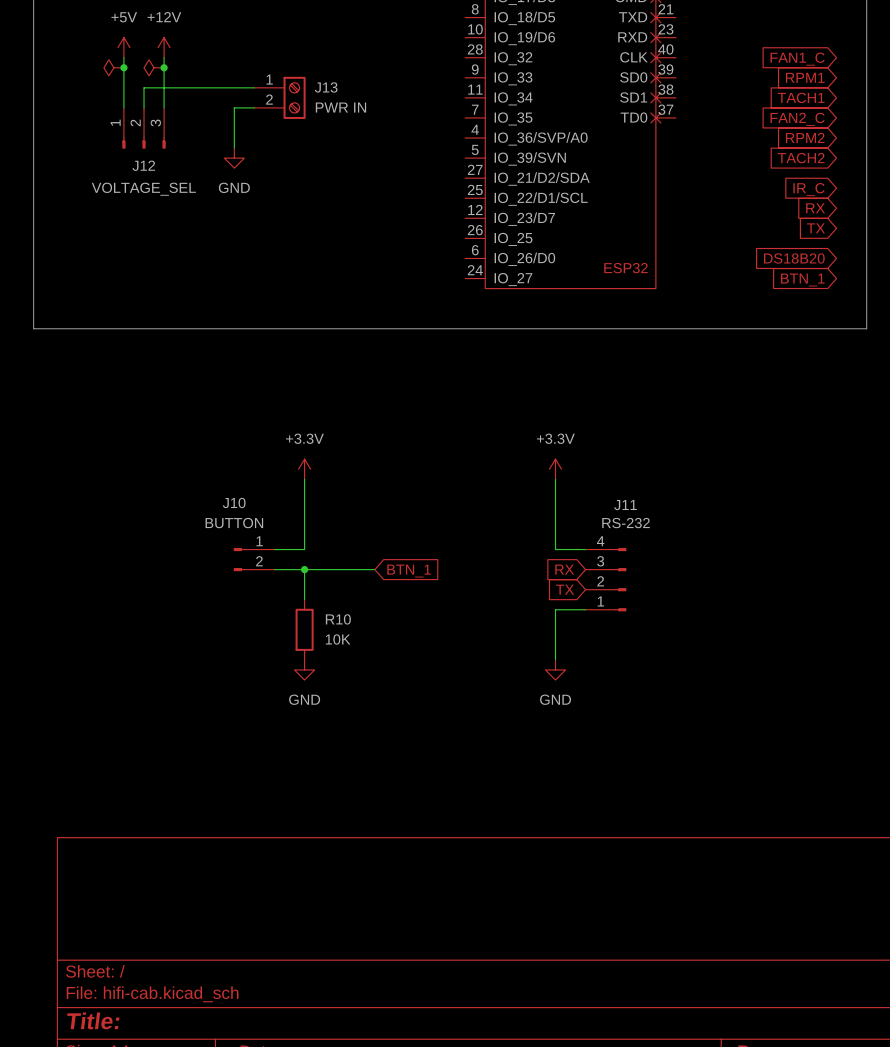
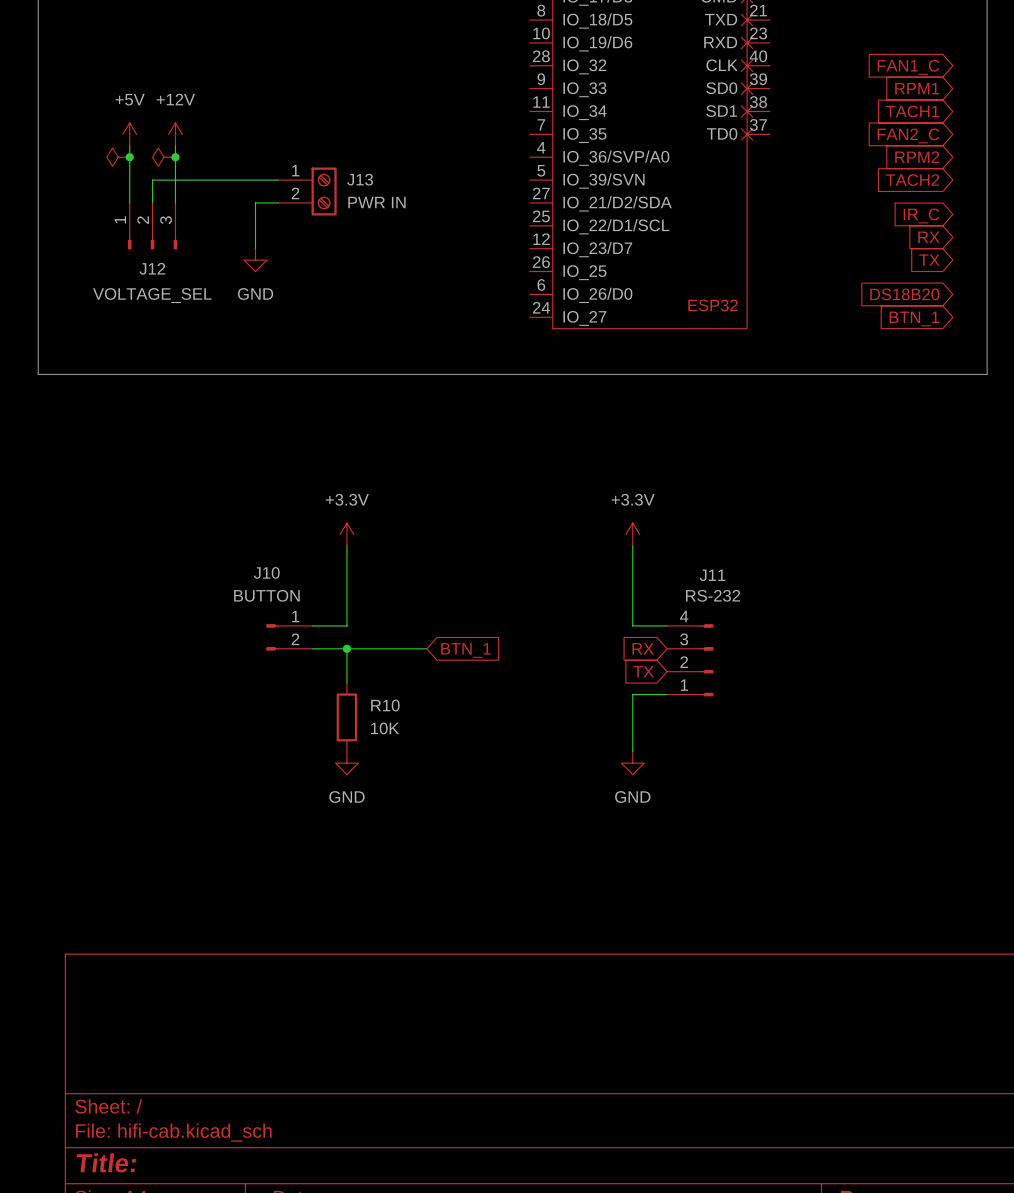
power symbol position: +5V (123, 47) -> +5V (129, 134)
power symbol position: +12V (164, 47) -> +12V (175, 134)
wire: (123, 57) (123, 107) -> (129, 145) (129, 202)
wire: (164, 57) (164, 107) -> (175, 145) (175, 202)
power symbol: (113, 67) -> none
junction: (123, 67) -> none
power symbol: (154, 67) -> none
junction: (164, 67) -> none
wire: (254, 87) (144, 87) (144, 107) -> (278, 180) (152, 180) (152, 202)
J13 position: (280, 97) -> (307, 191)
wire: (254, 107) (234, 107) (234, 148) -> (278, 202) (255, 202) (255, 248)
J12 position: (144, 128) -> (152, 226)
power symbol: none -> (118, 157)
junction: none -> (129, 157)
power symbol: none -> (164, 157)
junction: none -> (175, 157)
power symbol position: GND (234, 158) -> GND (255, 260)

